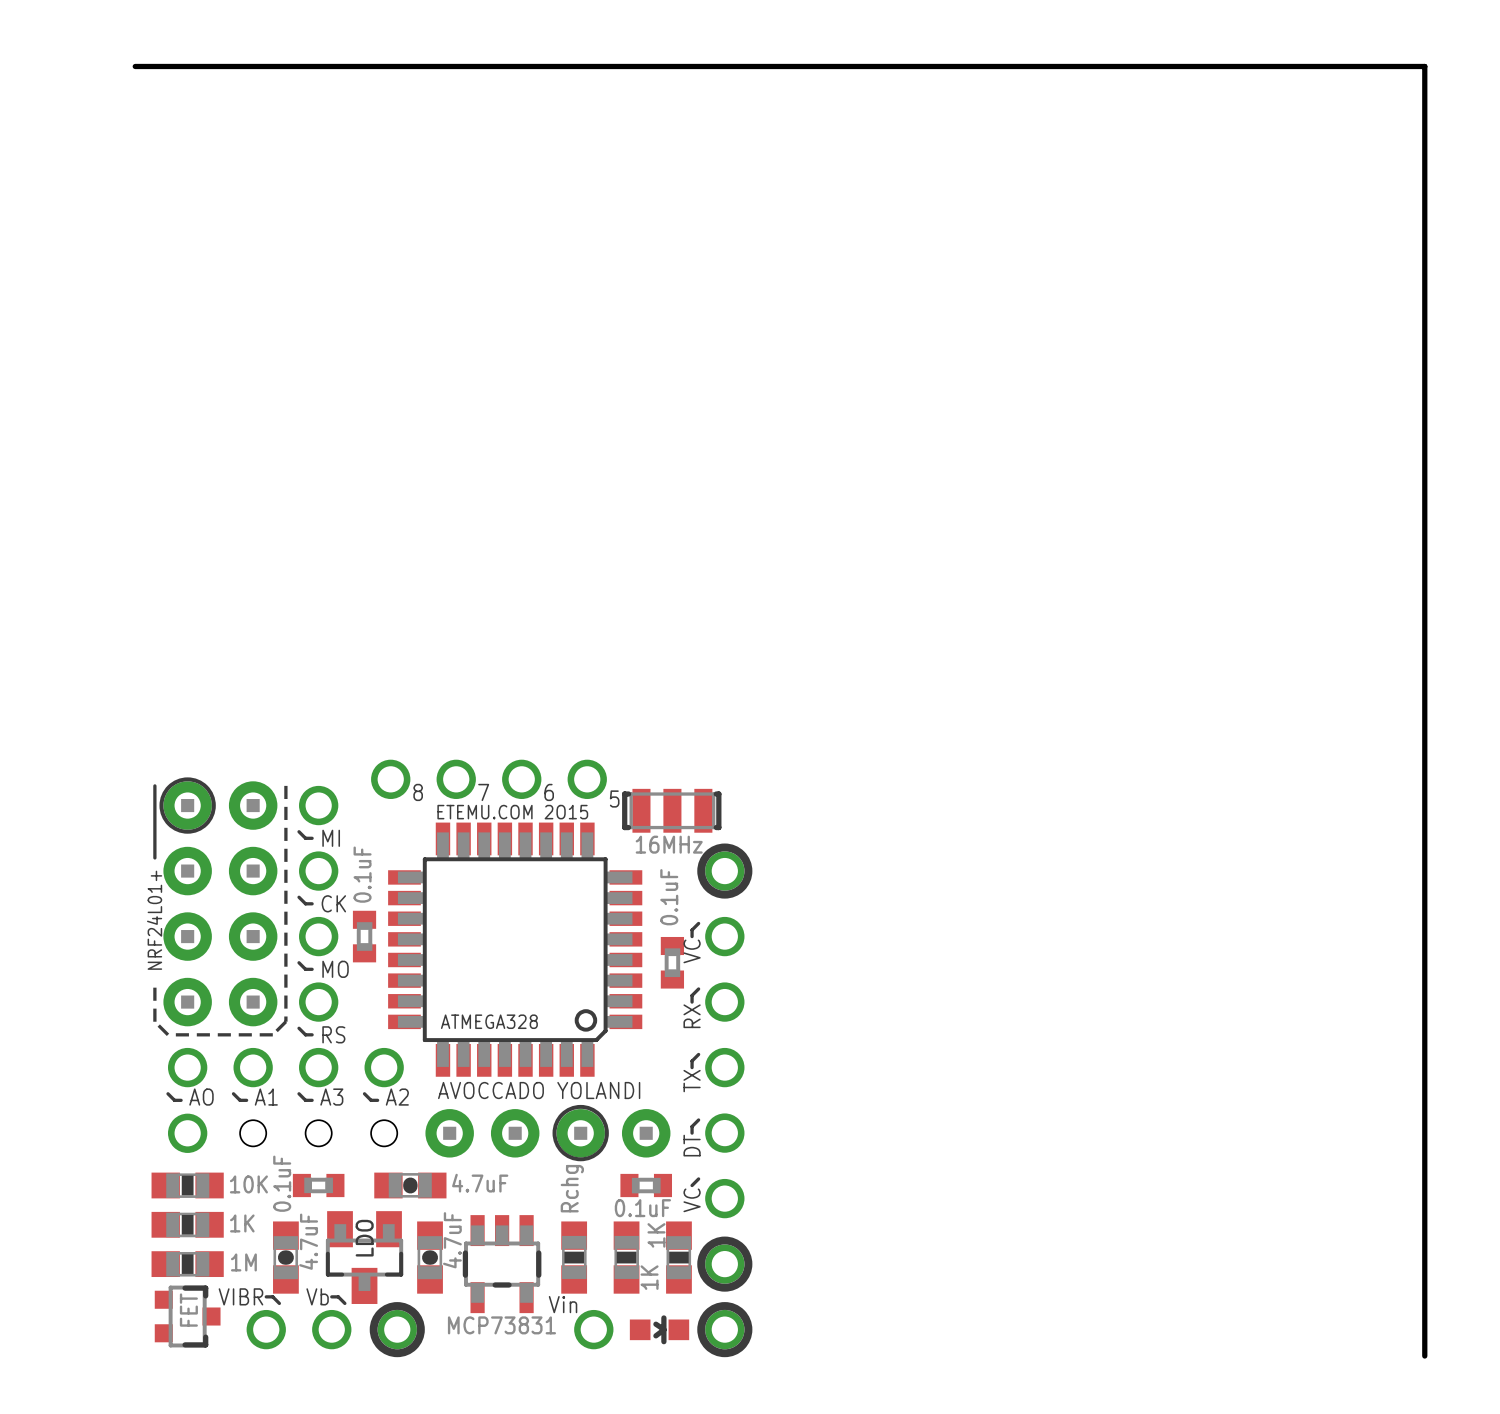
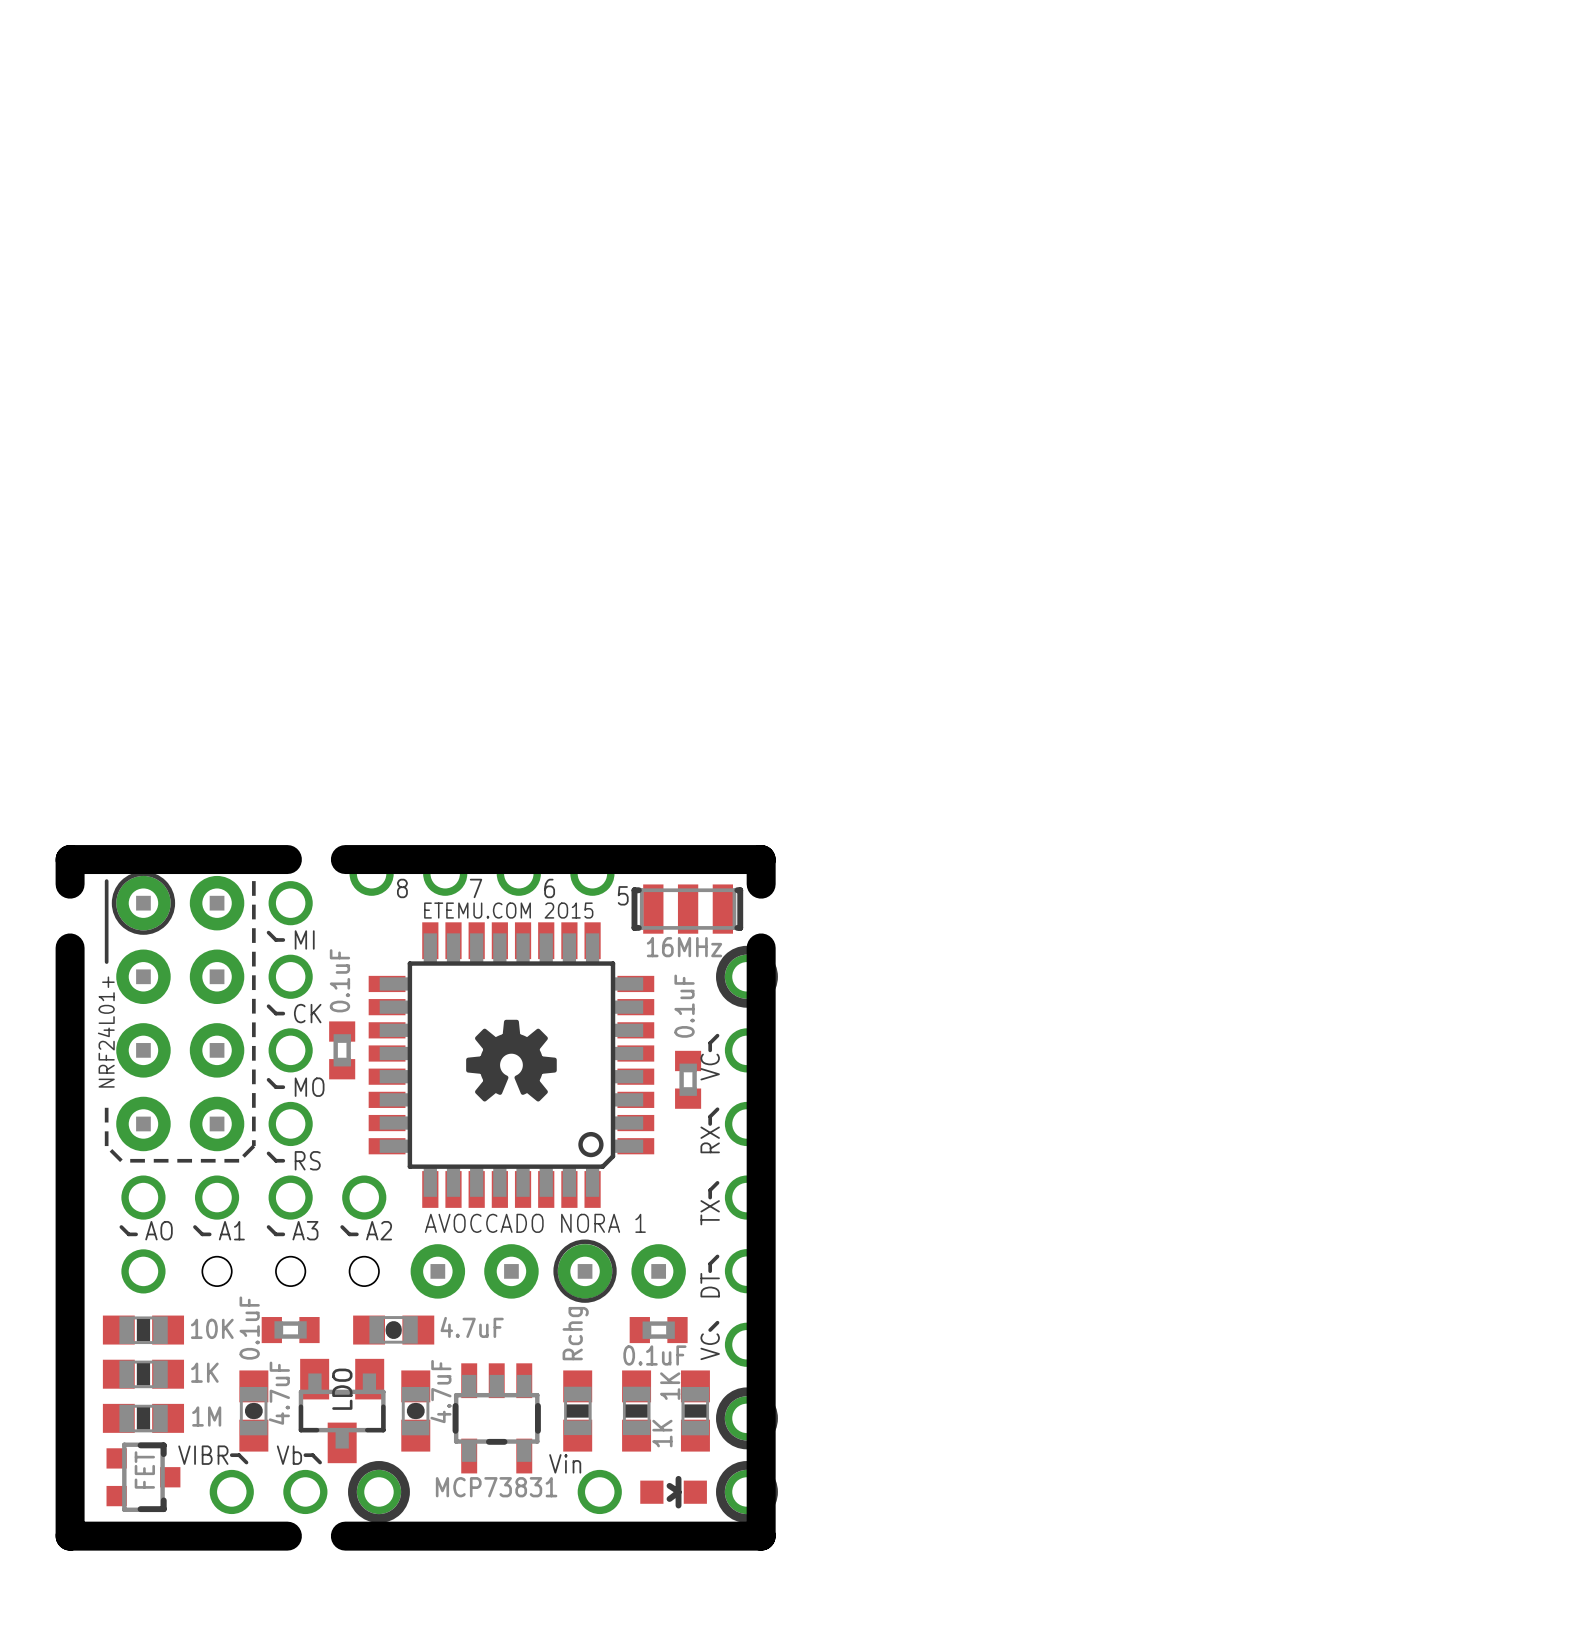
board edge: (135, 66) (1424, 66) (1424, 1356) -> none
board edge: none -> (287, 859) (70, 859) (70, 884)
board edge: none -> (345, 859) (761, 859) (761, 884)
board edge: none -> (70, 947) (70, 1536) (287, 1536)
board edge: none -> (761, 947) (761, 1536) (345, 1536)
drawing: none -> [466, 1019, 557, 1102]
text: ATMEGA328 (489, 1021) -> none
text: AVOCCADO YOLANDI (539, 1090) -> AVOCCADO NORA 1 (535, 1223)

